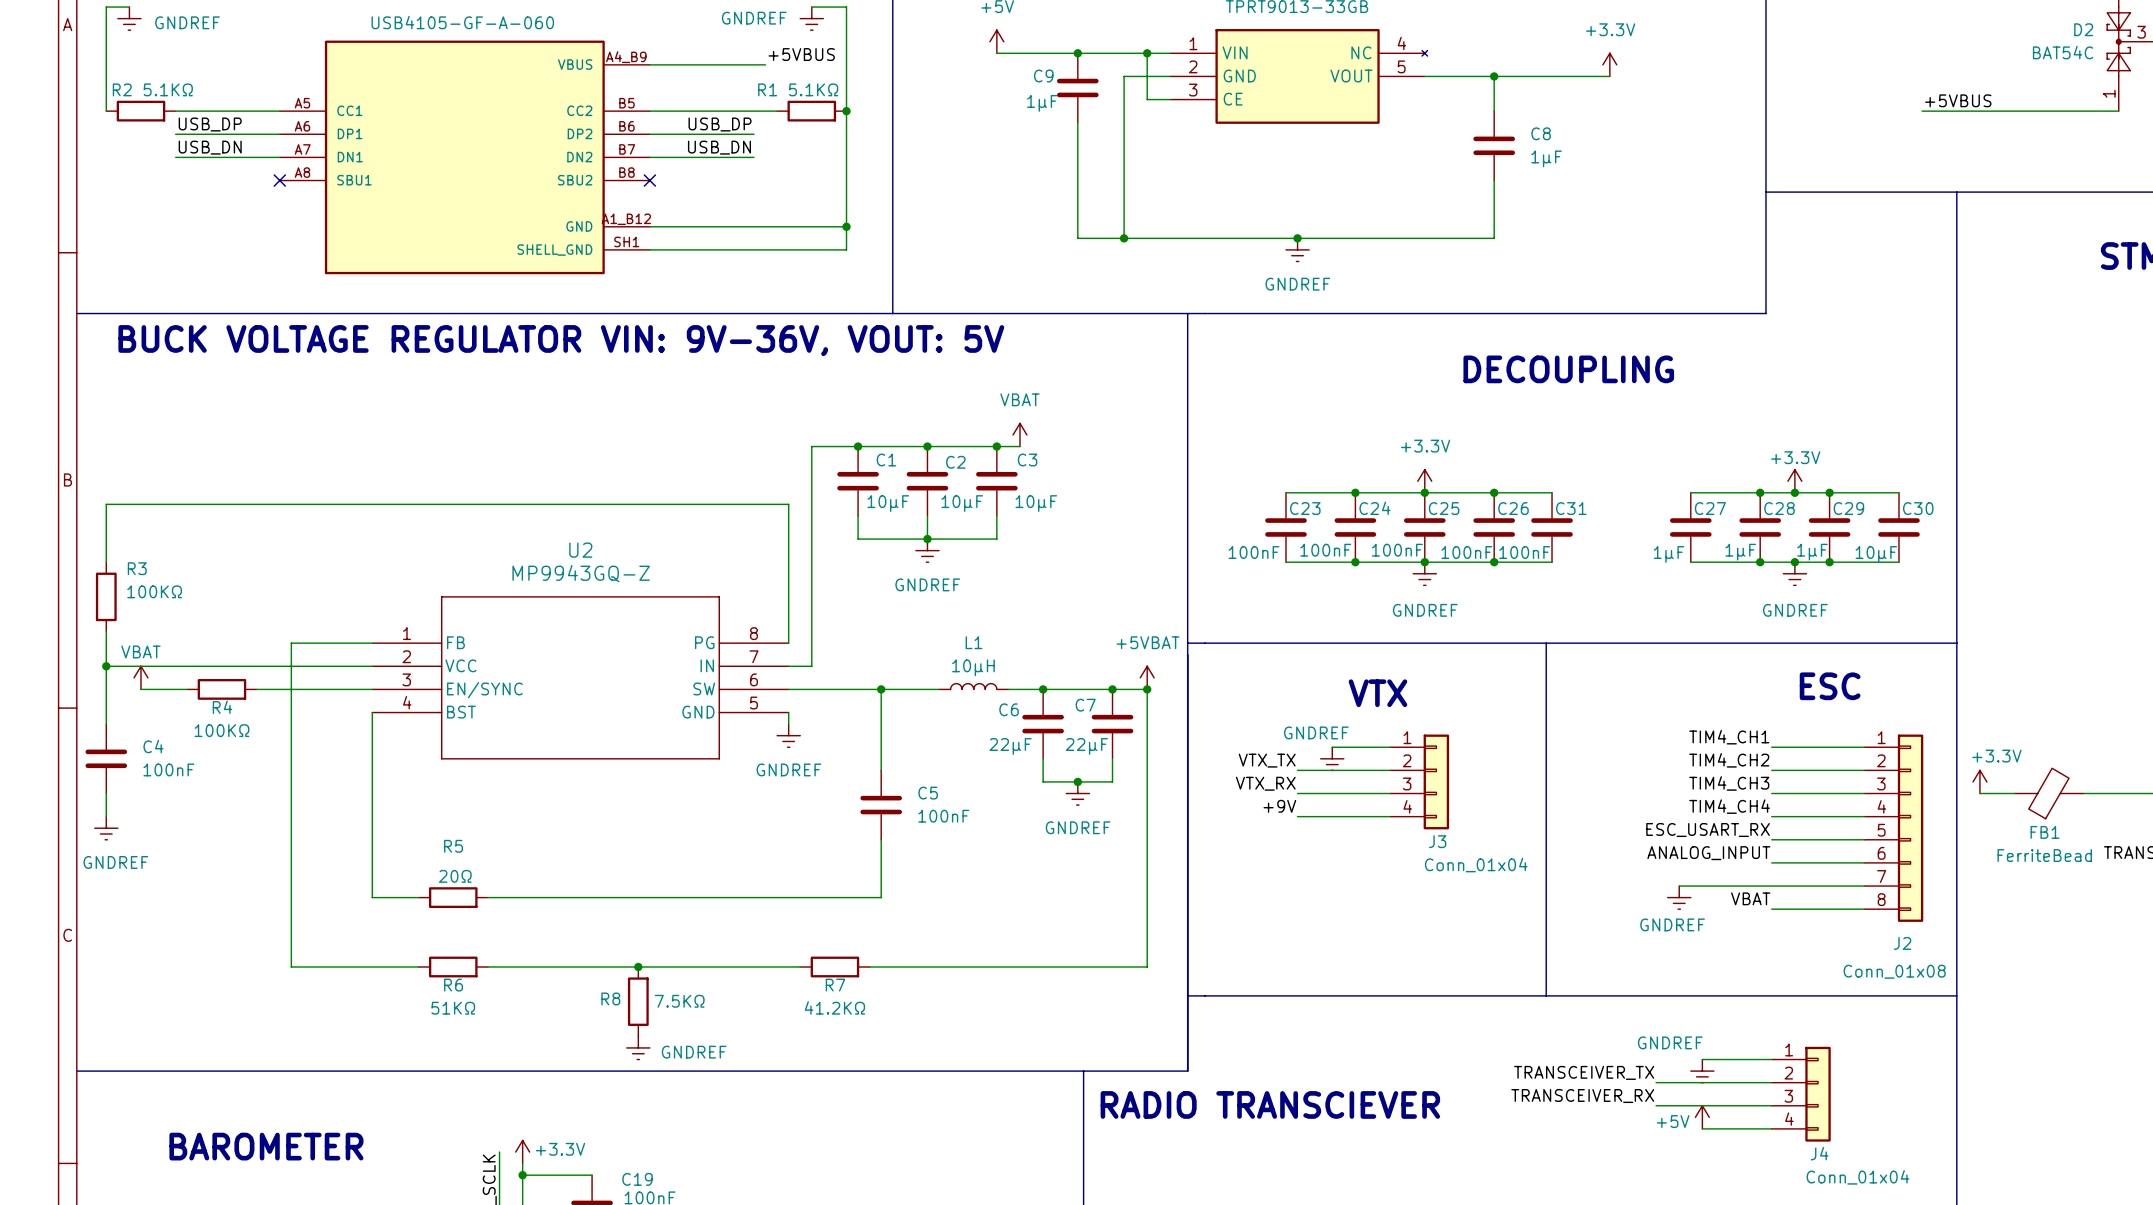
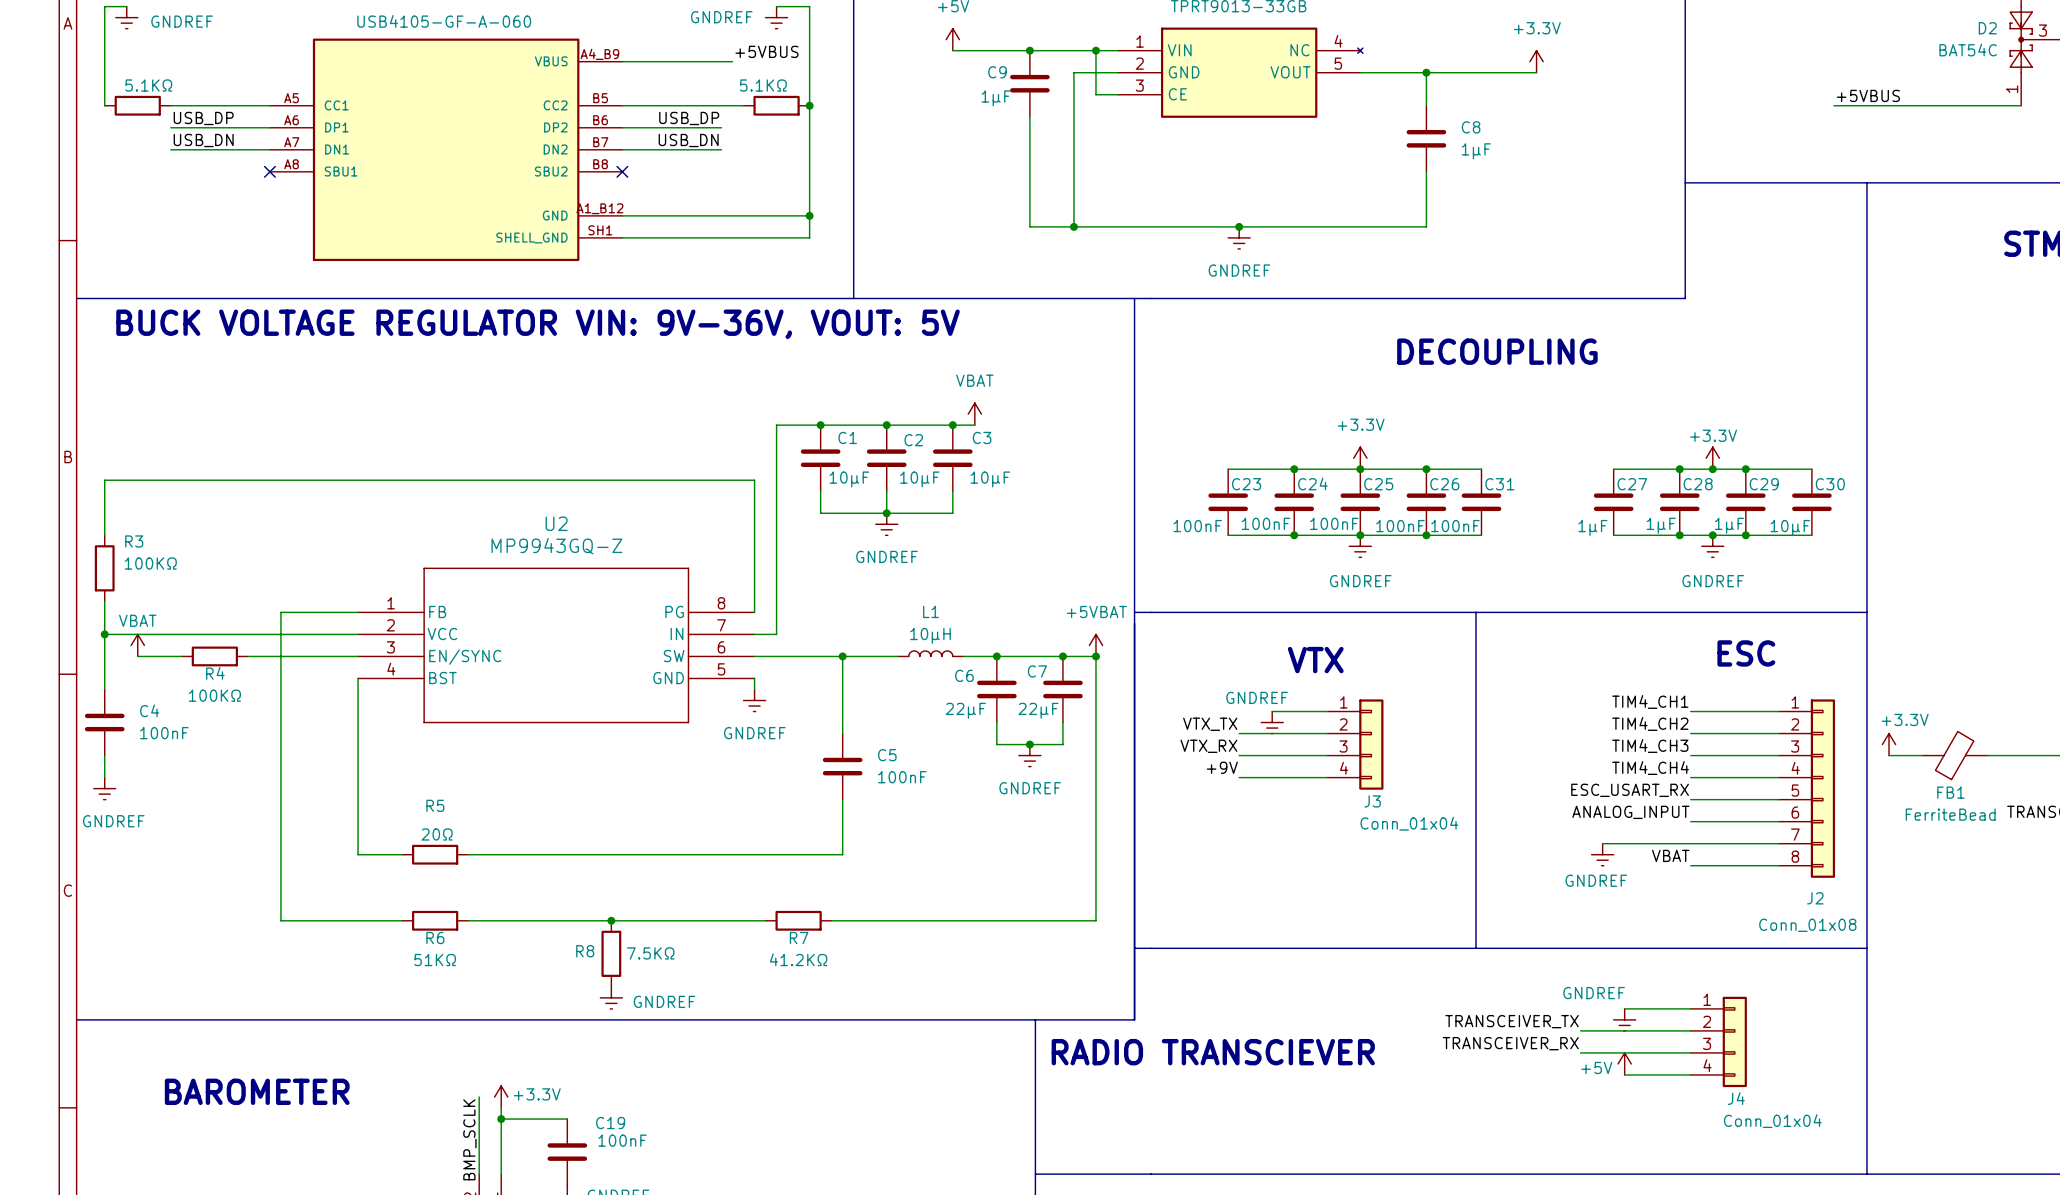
part value: R2 5.1KΩ (152, 89) -> 5.1KΩ (148, 85)
part value: R1 5.1KΩ (798, 89) -> 5.1KΩ (763, 85)

